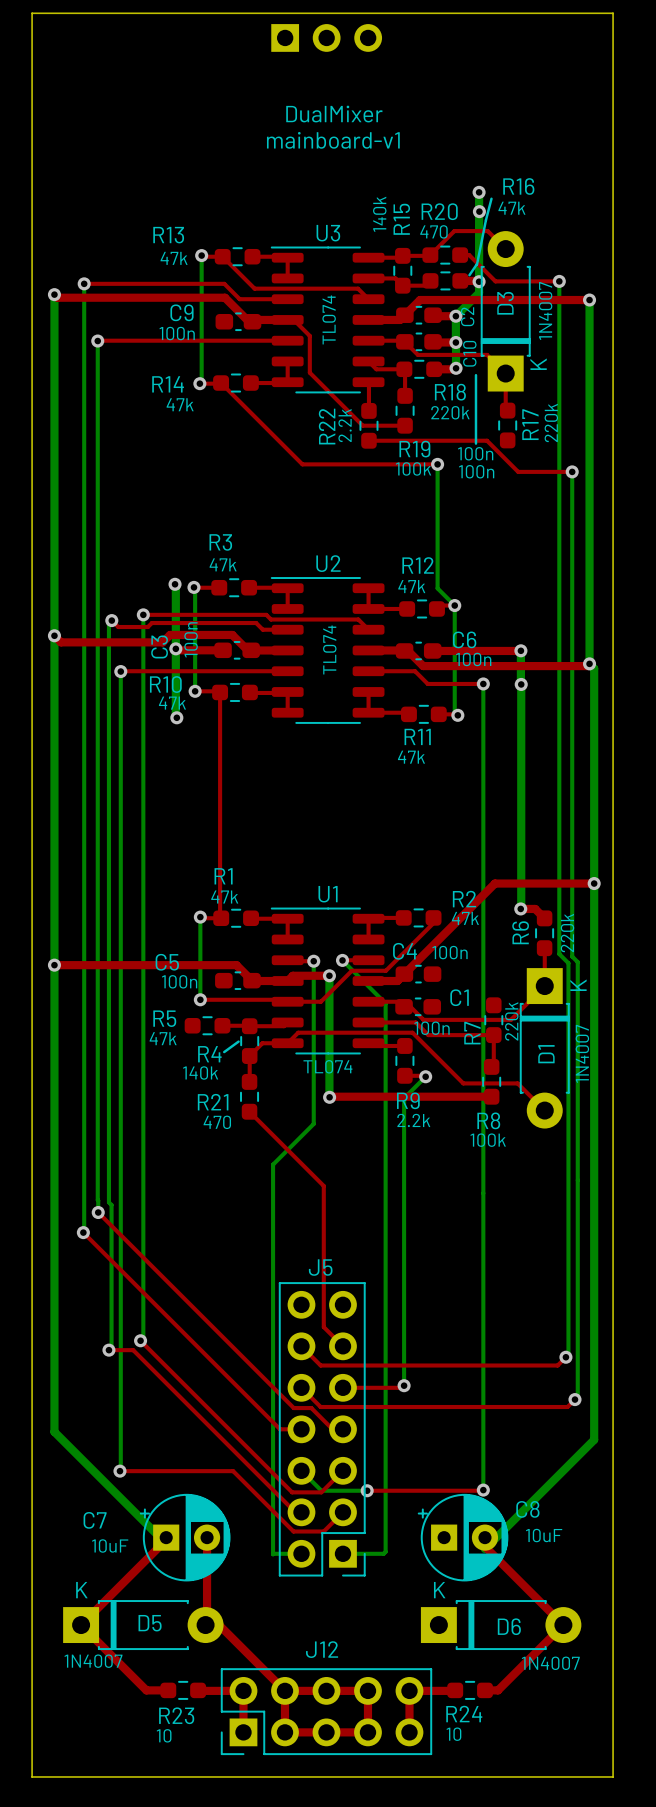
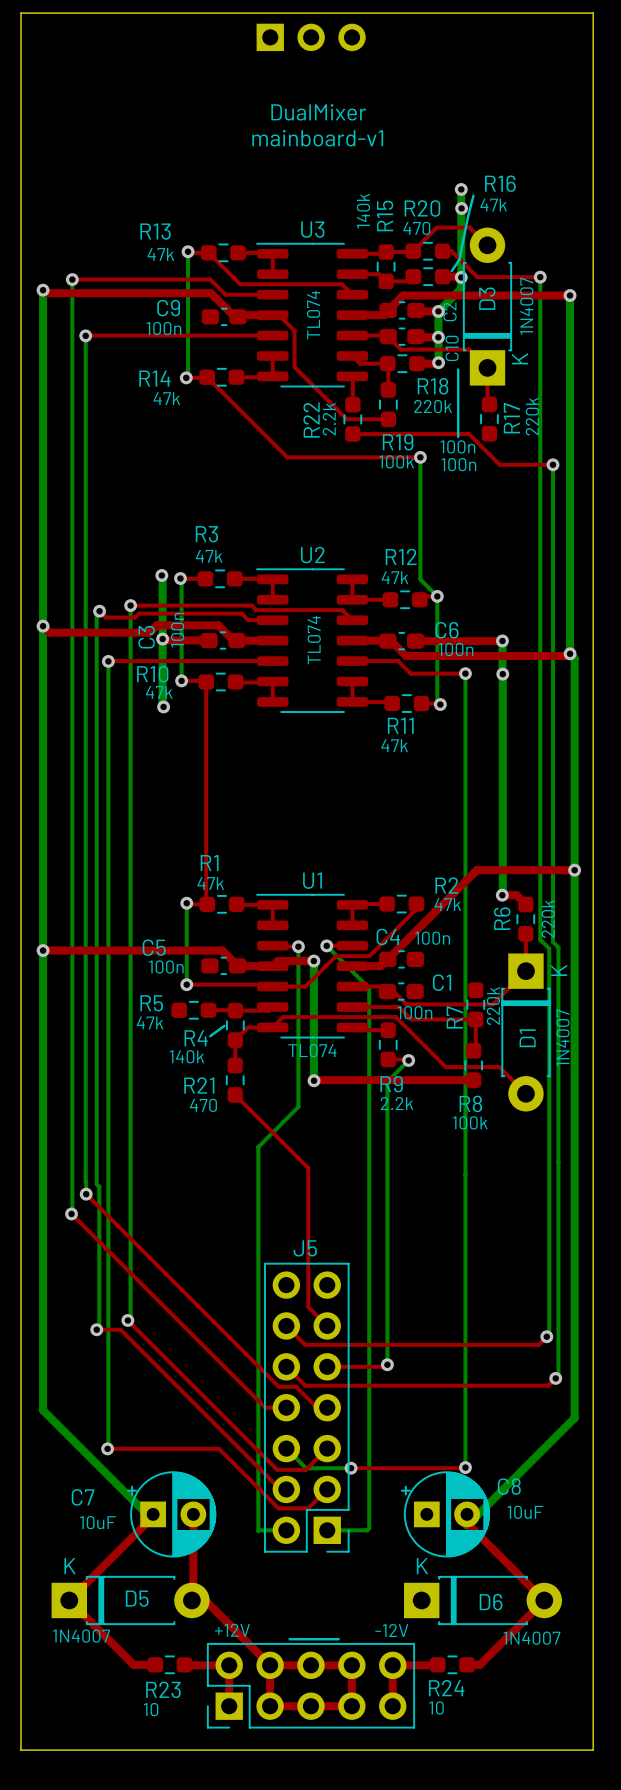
J12 name: J12 (322, 1649) -> none
text: none -> +12V (232, 1630)
text: none -> -12V (391, 1630)
line: none -> (289, 1639) (338, 1639)

